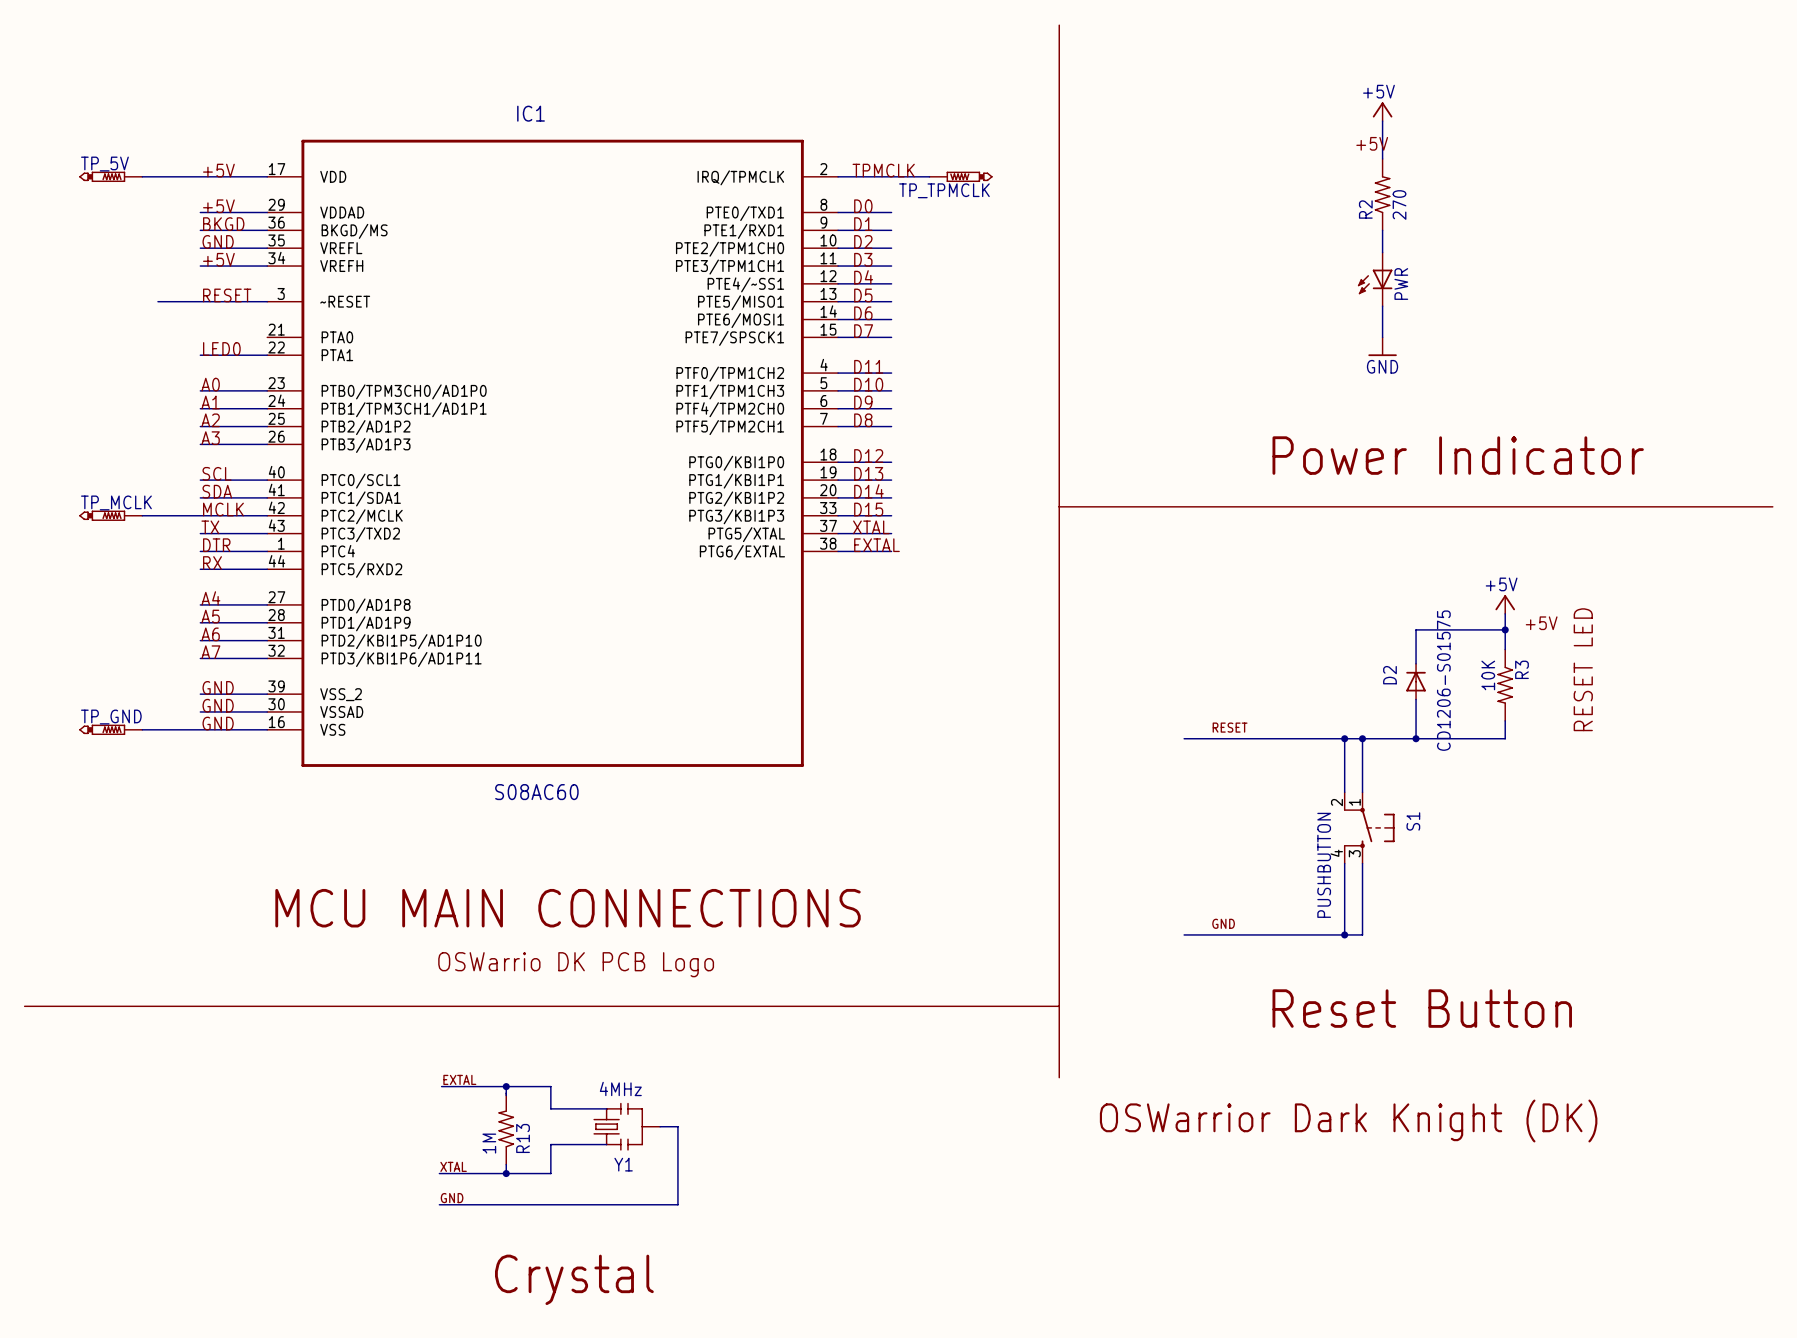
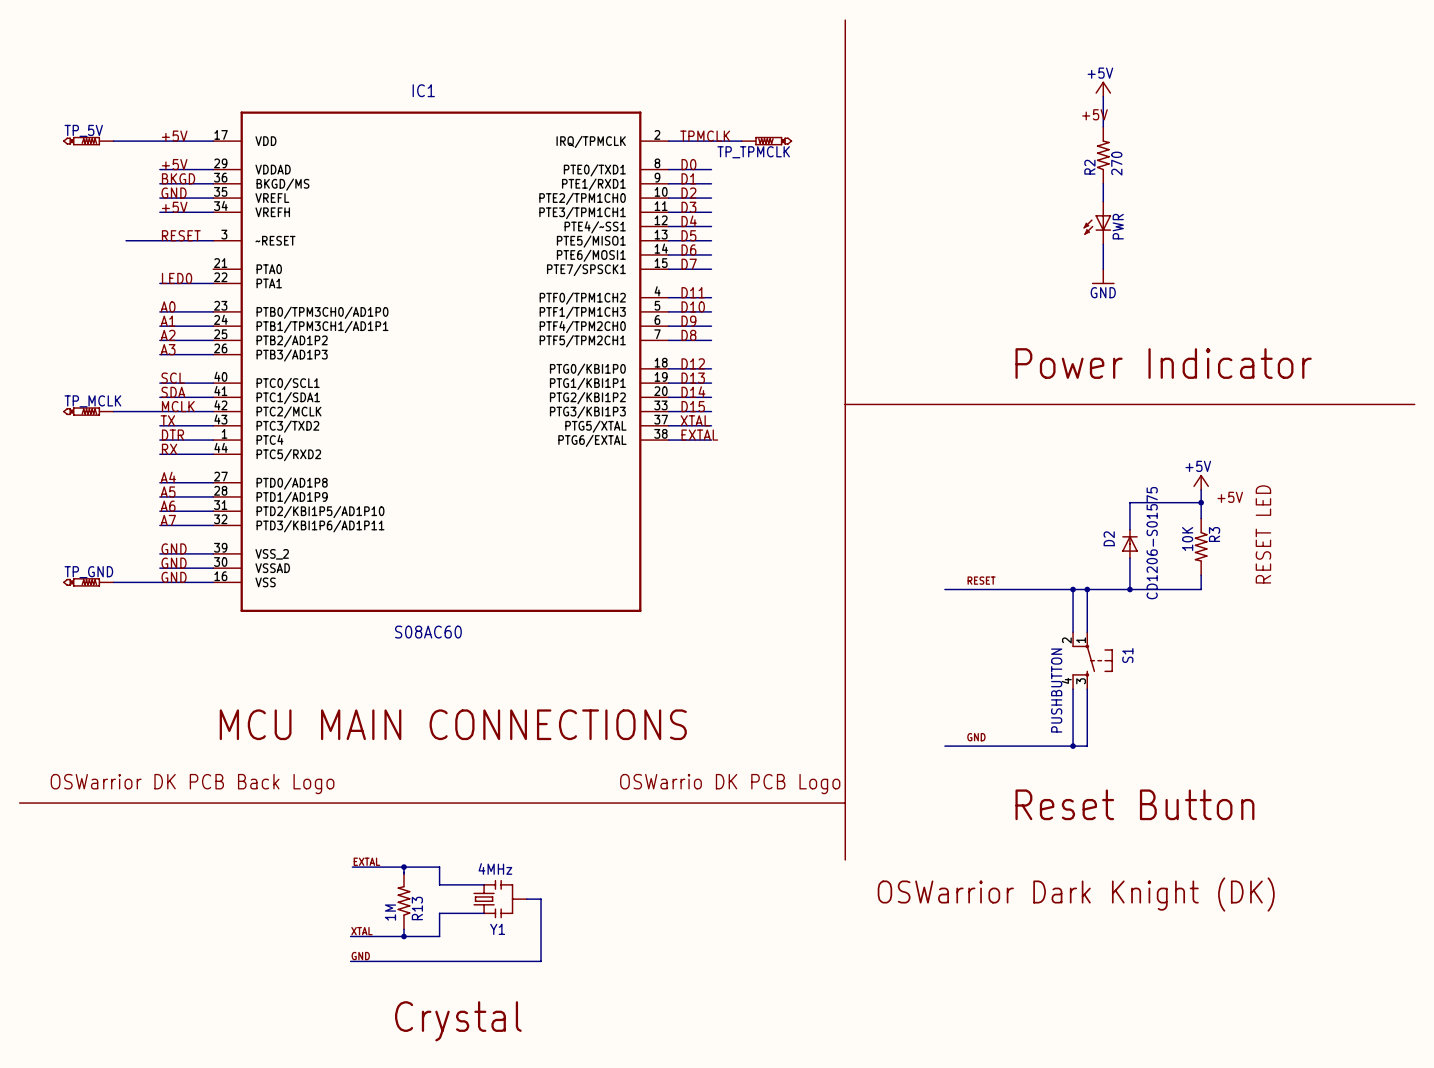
part: (576, 964) -> none
part: none -> (192, 784)
part: none -> (730, 784)

